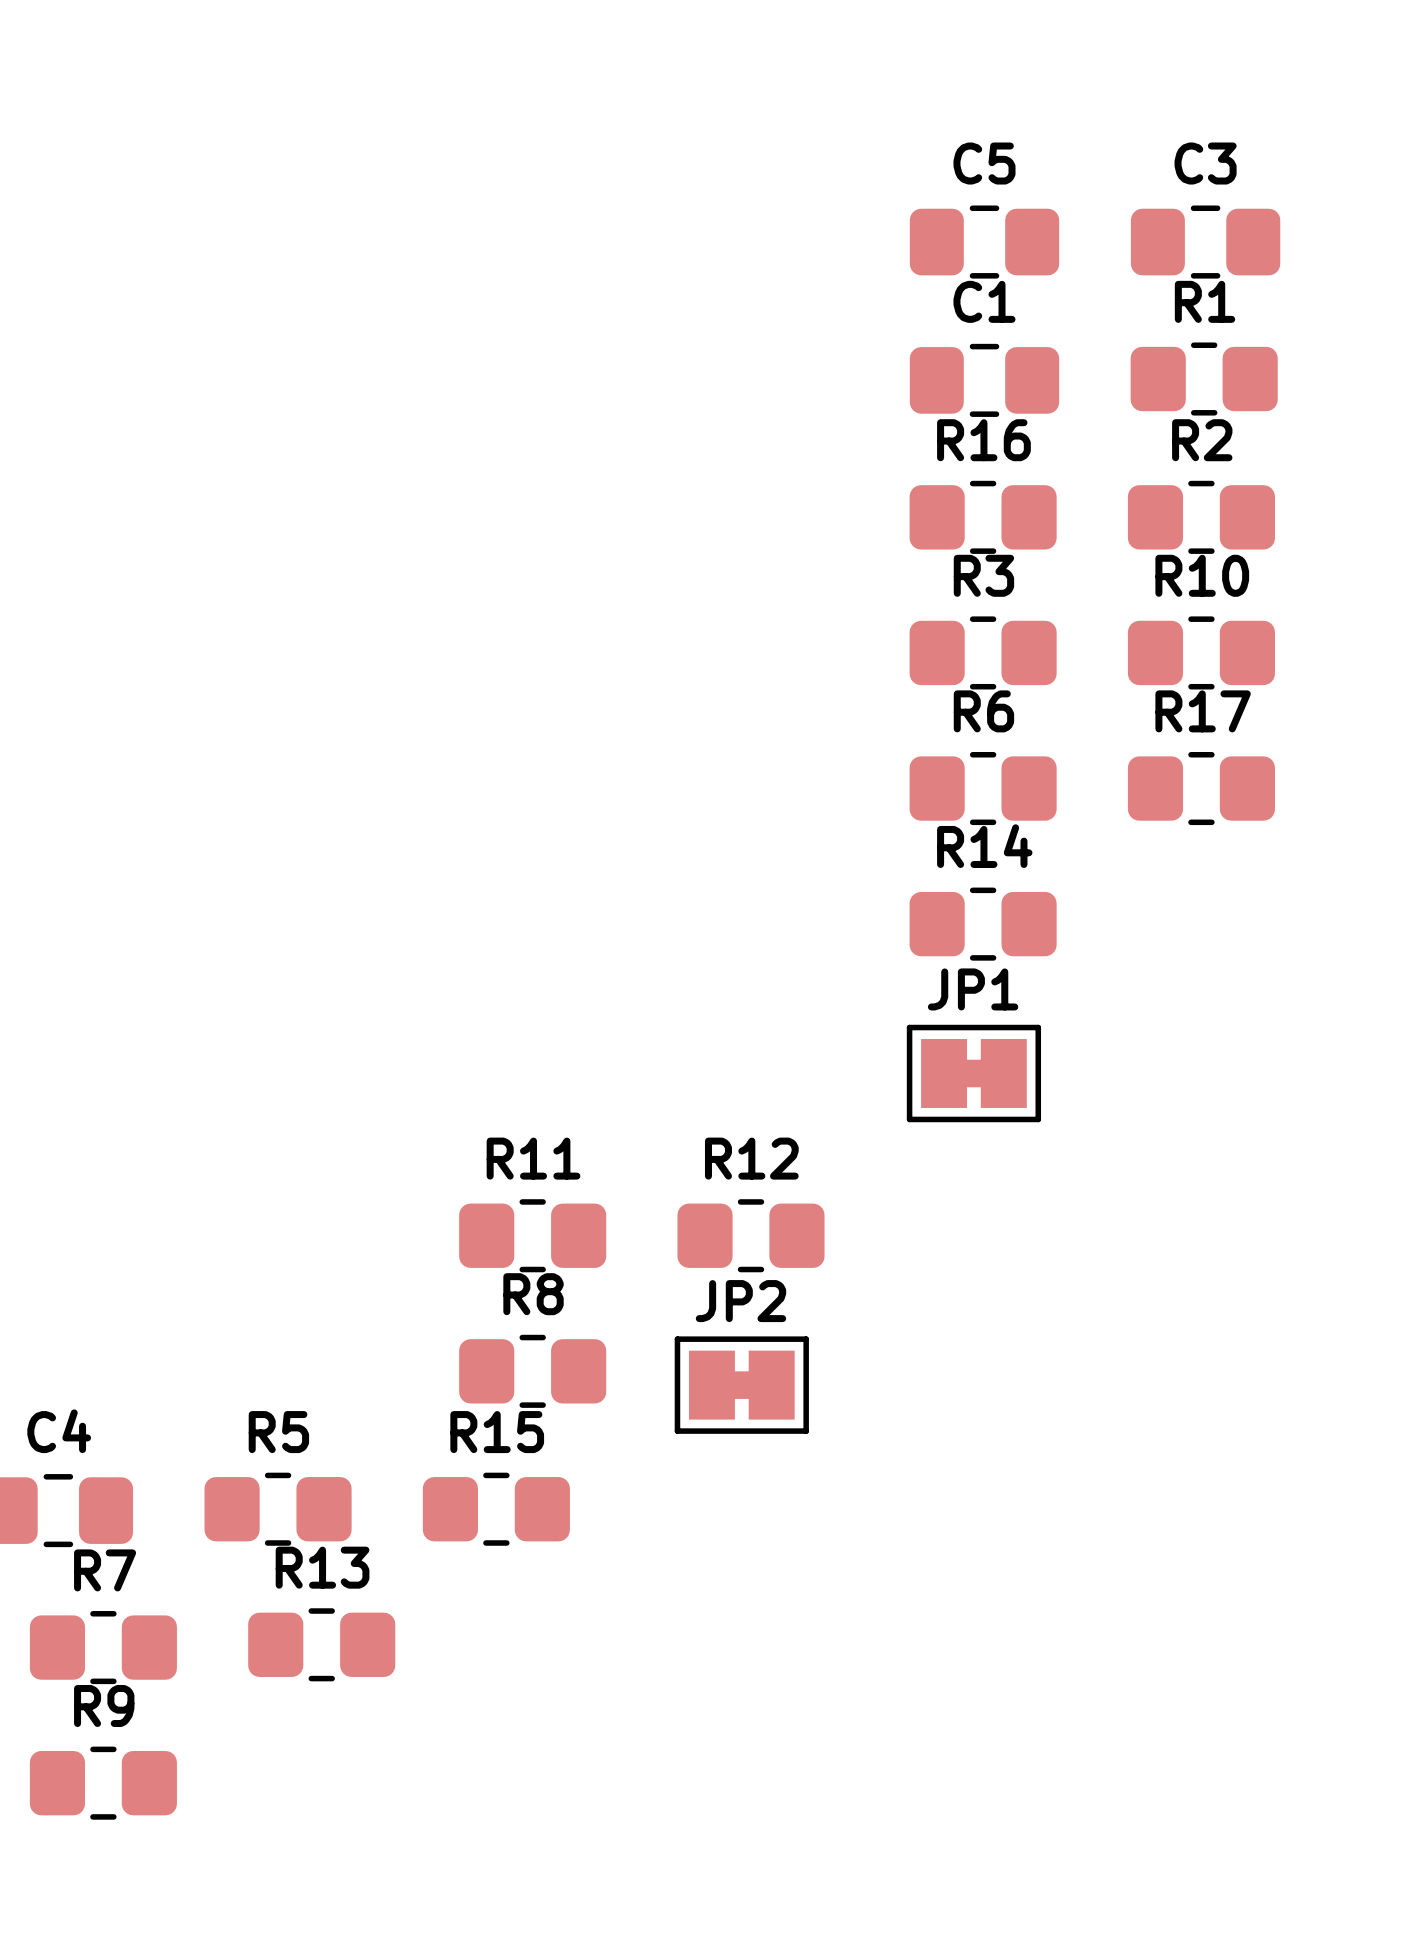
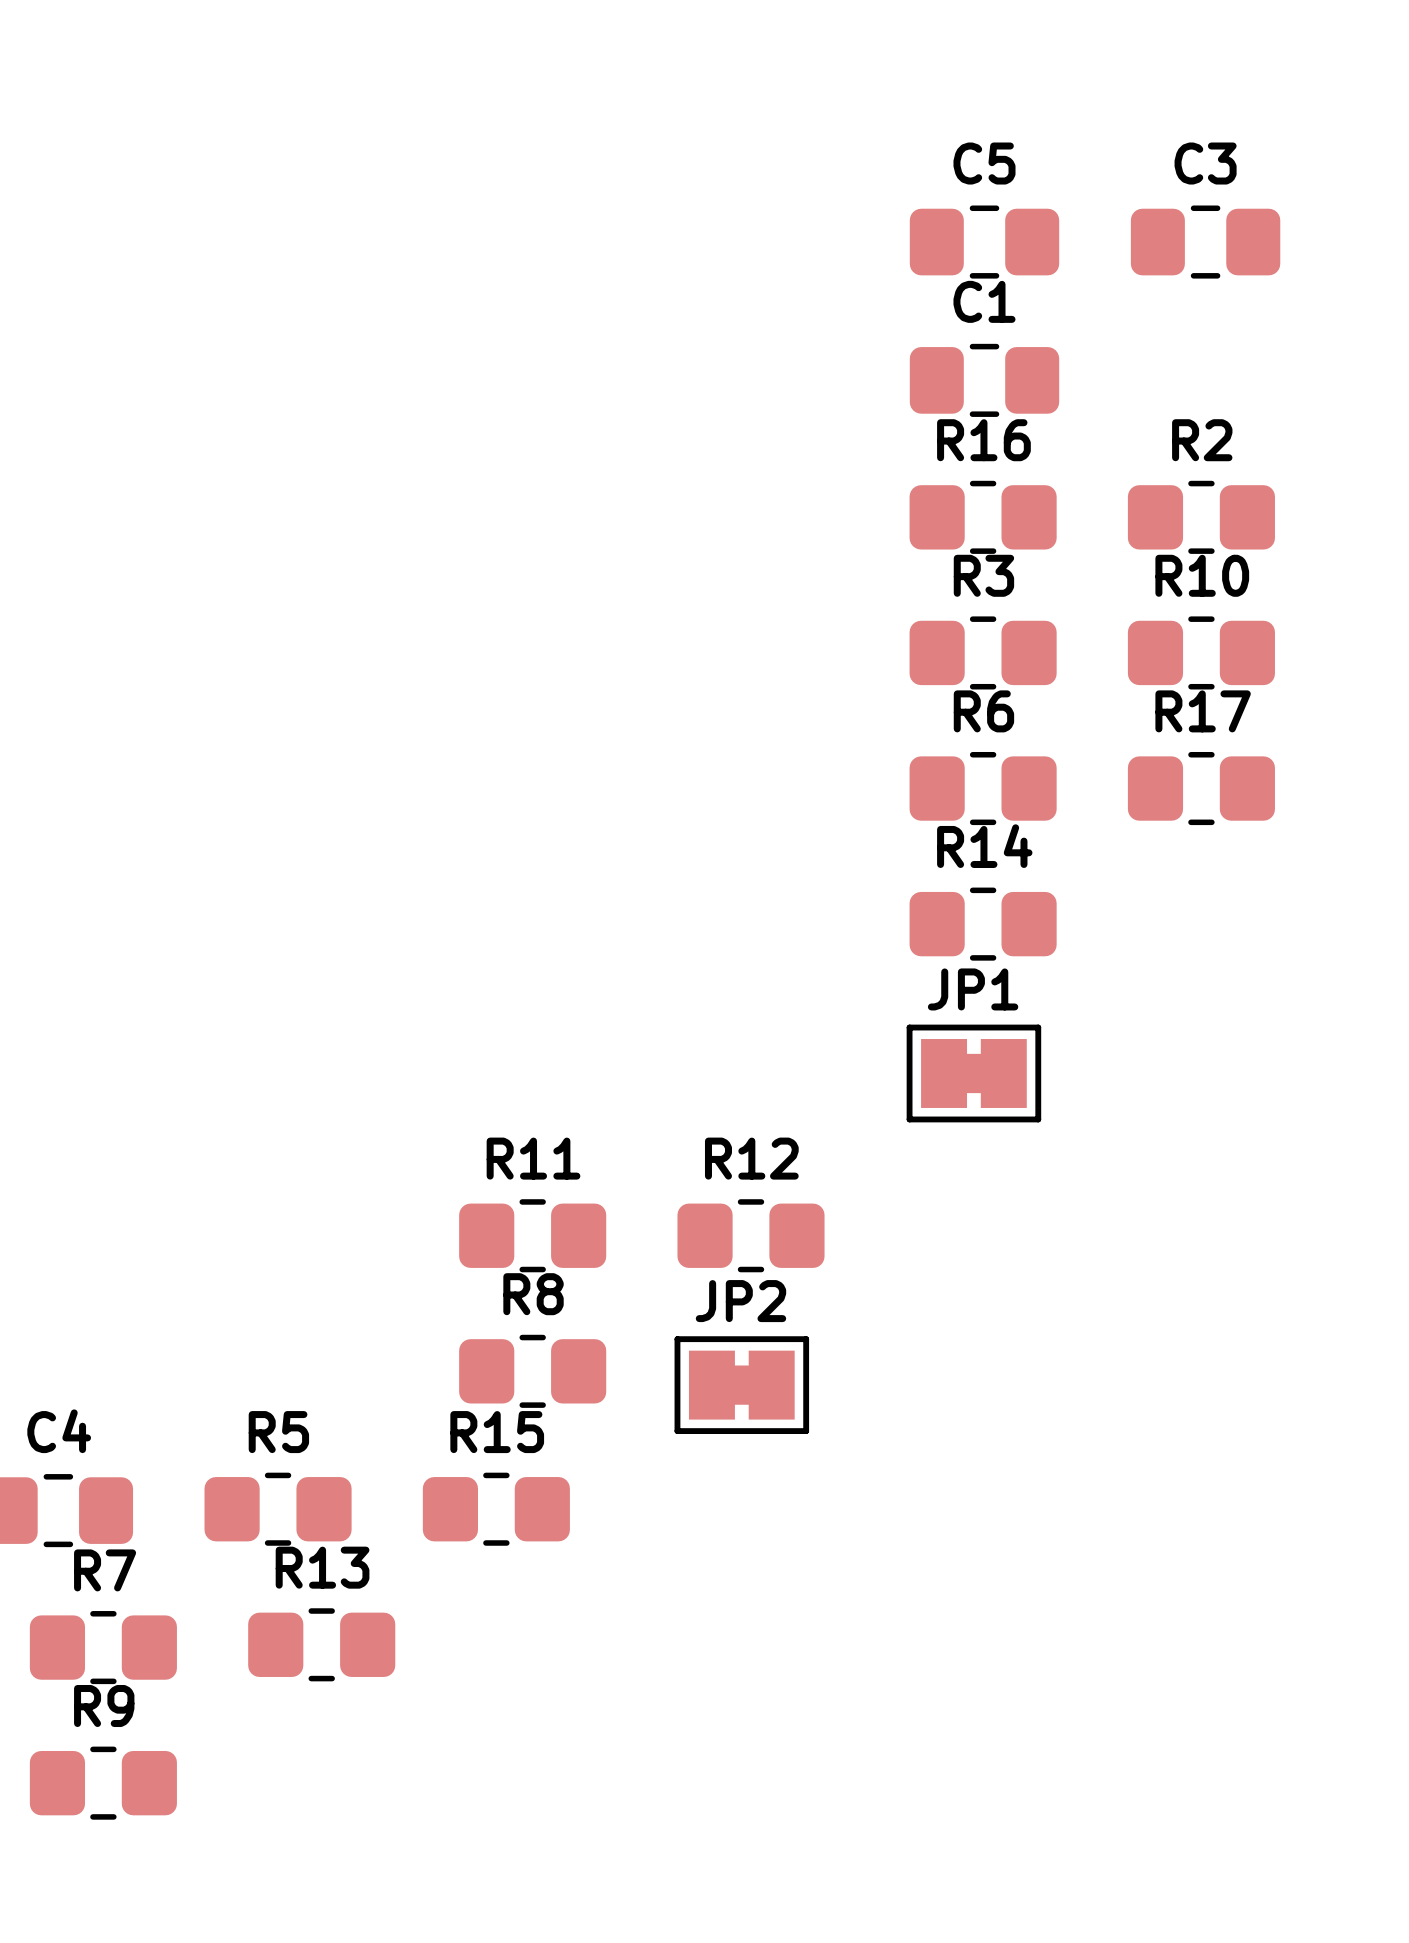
R1: (1204, 379) -> none
JP1 footprint: [906, 1024, 1042, 1123] -> [906, 1024, 1042, 1123]
JP2 footprint: [674, 1336, 809, 1434] -> [674, 1336, 810, 1435]

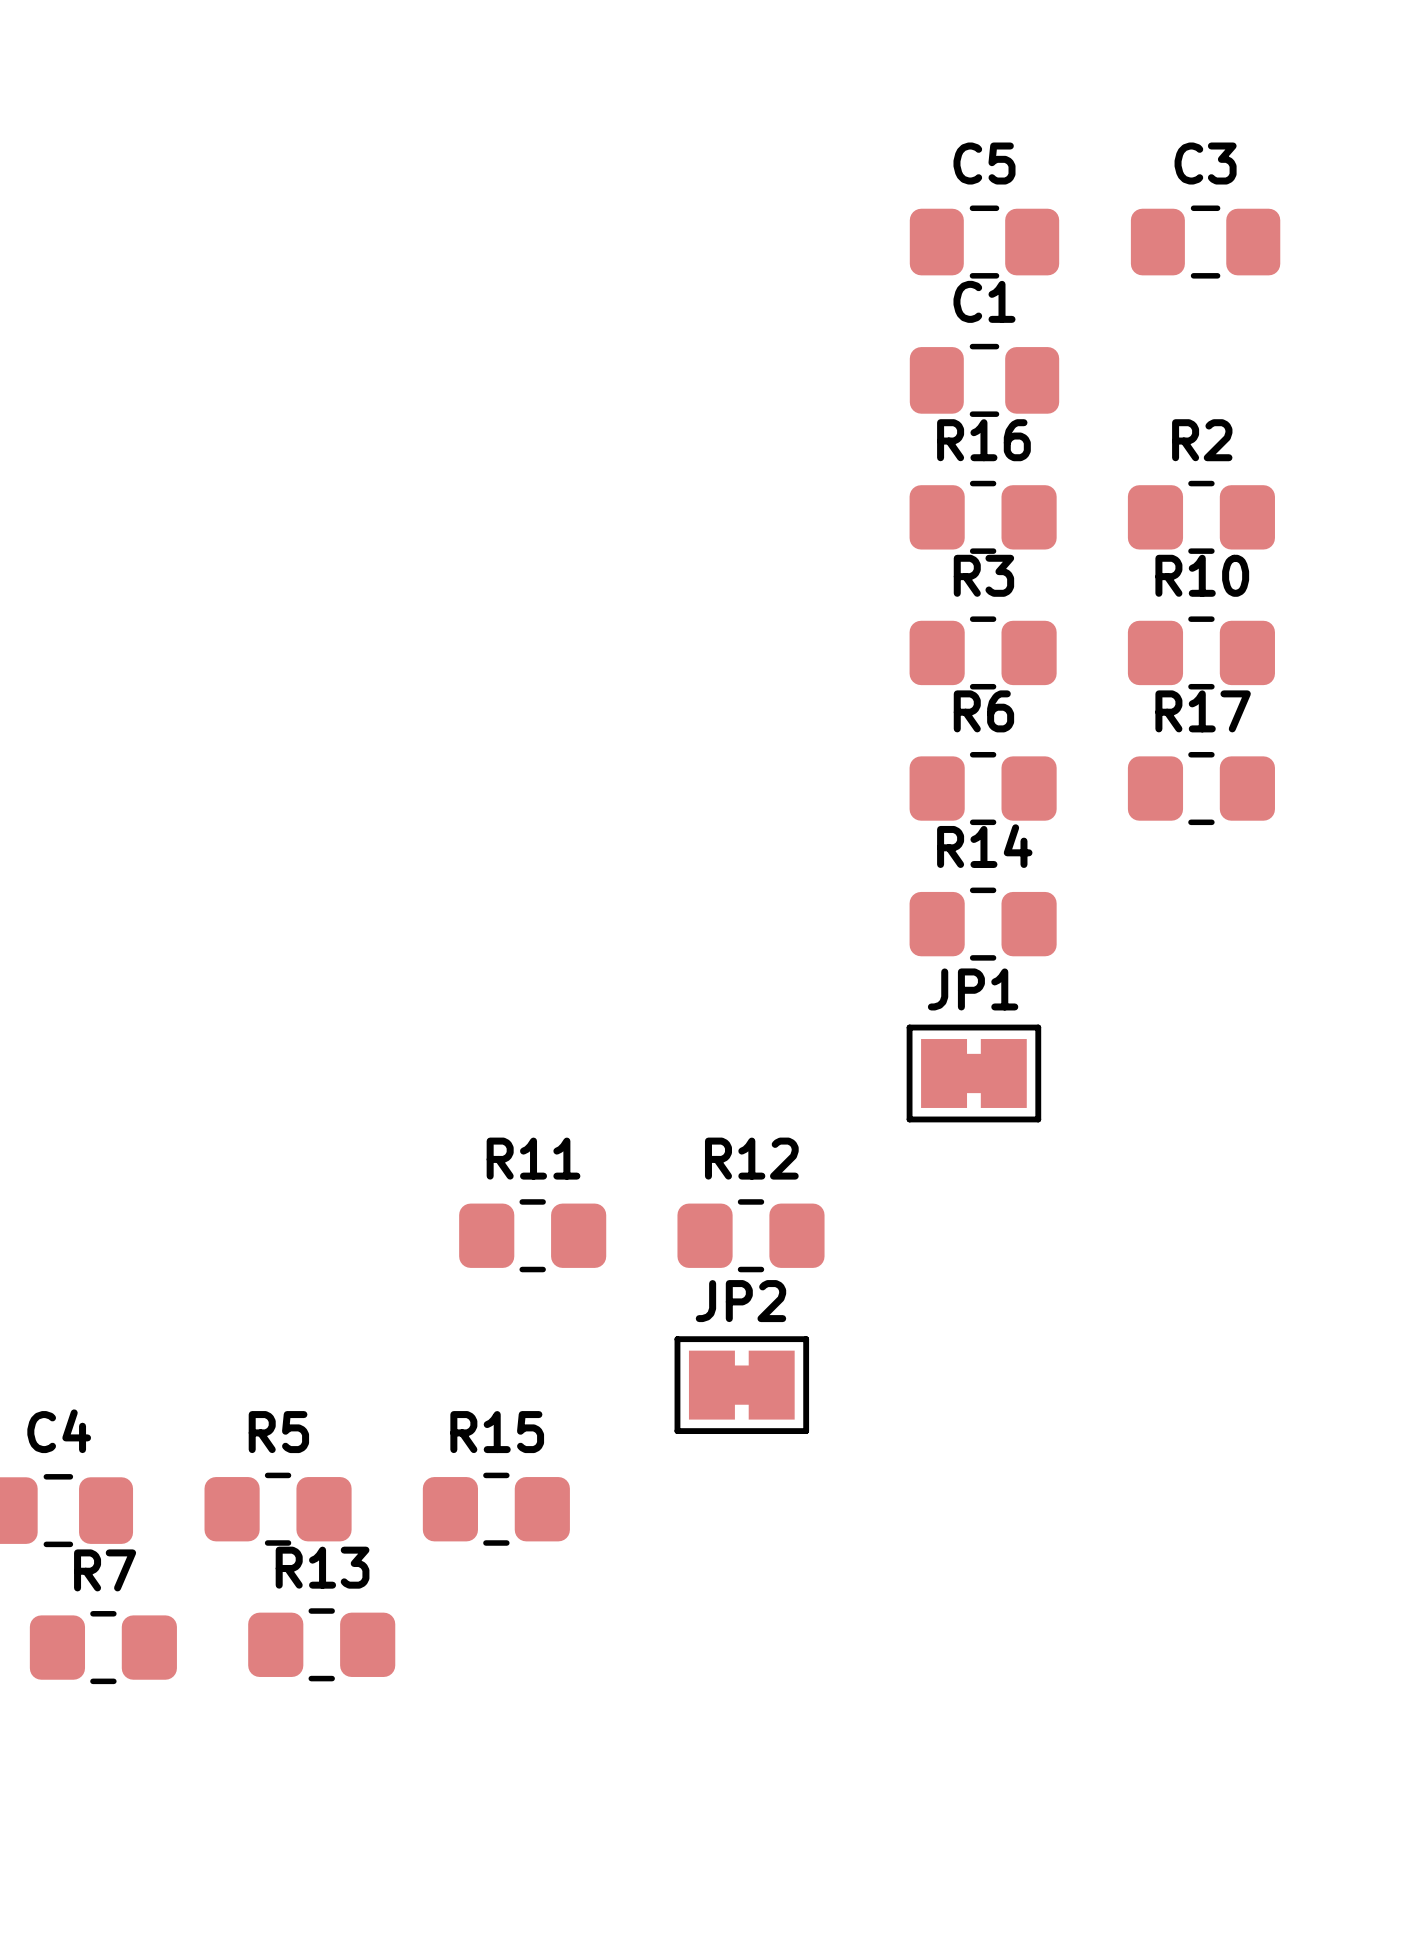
R8: (532, 1371) -> none
R9: (103, 1783) -> none

